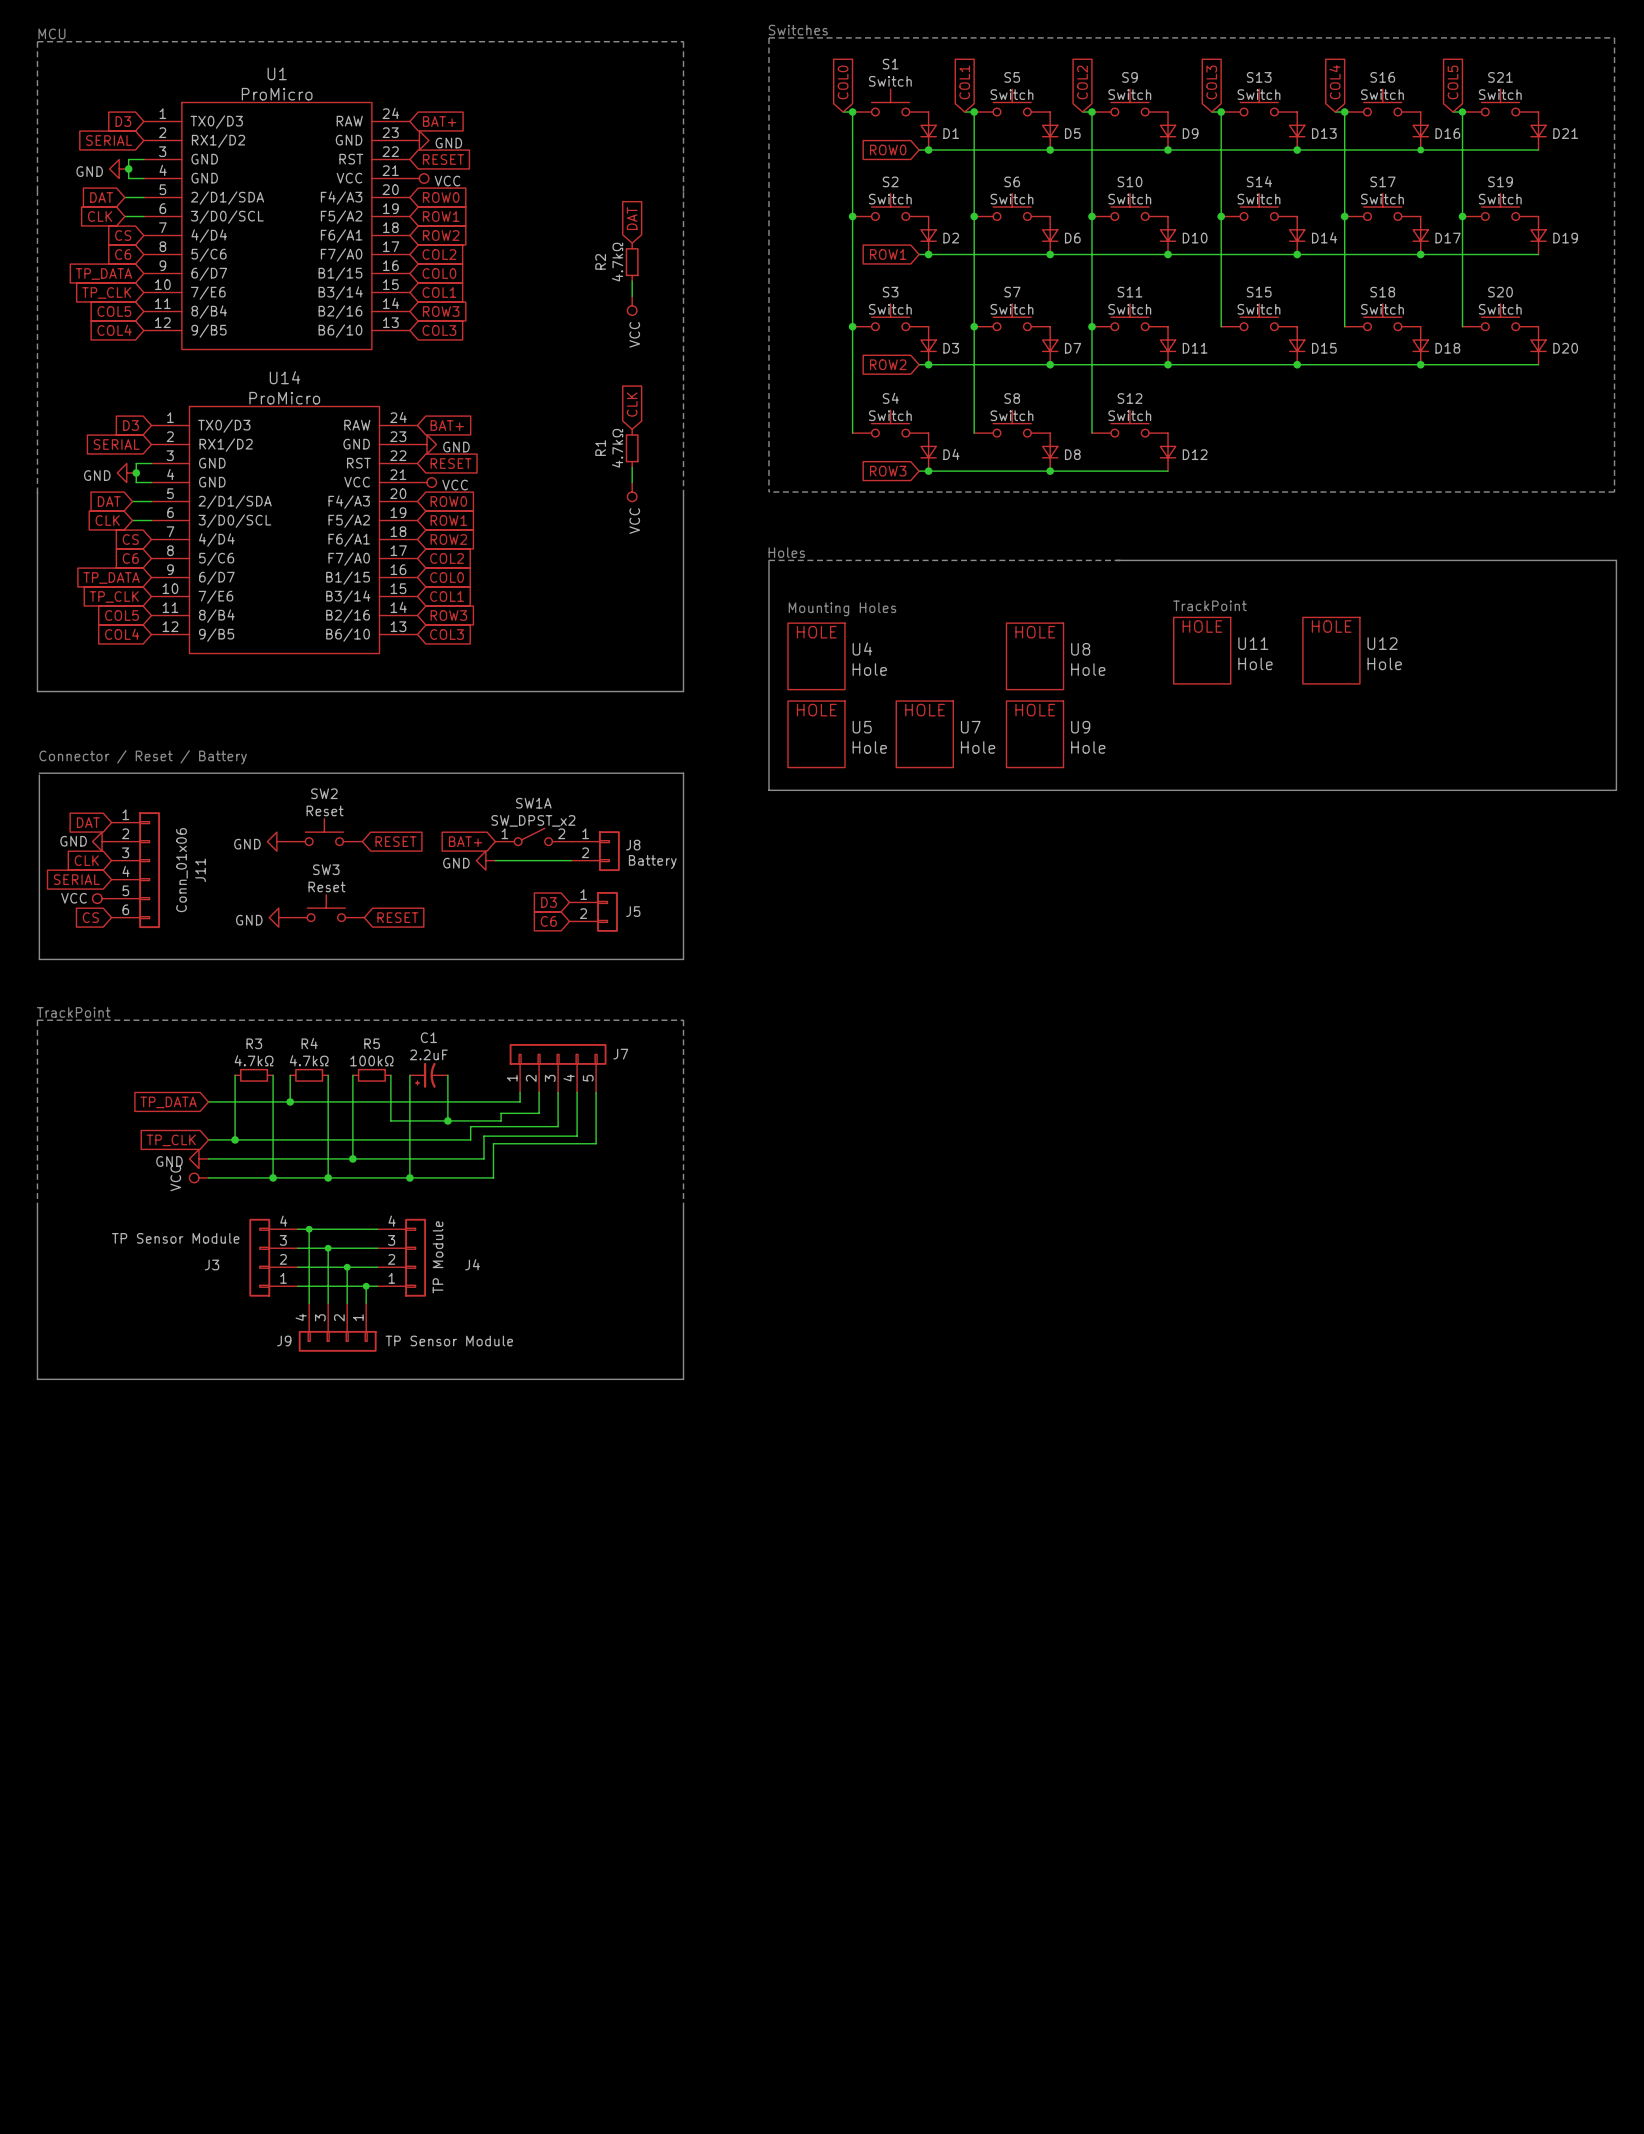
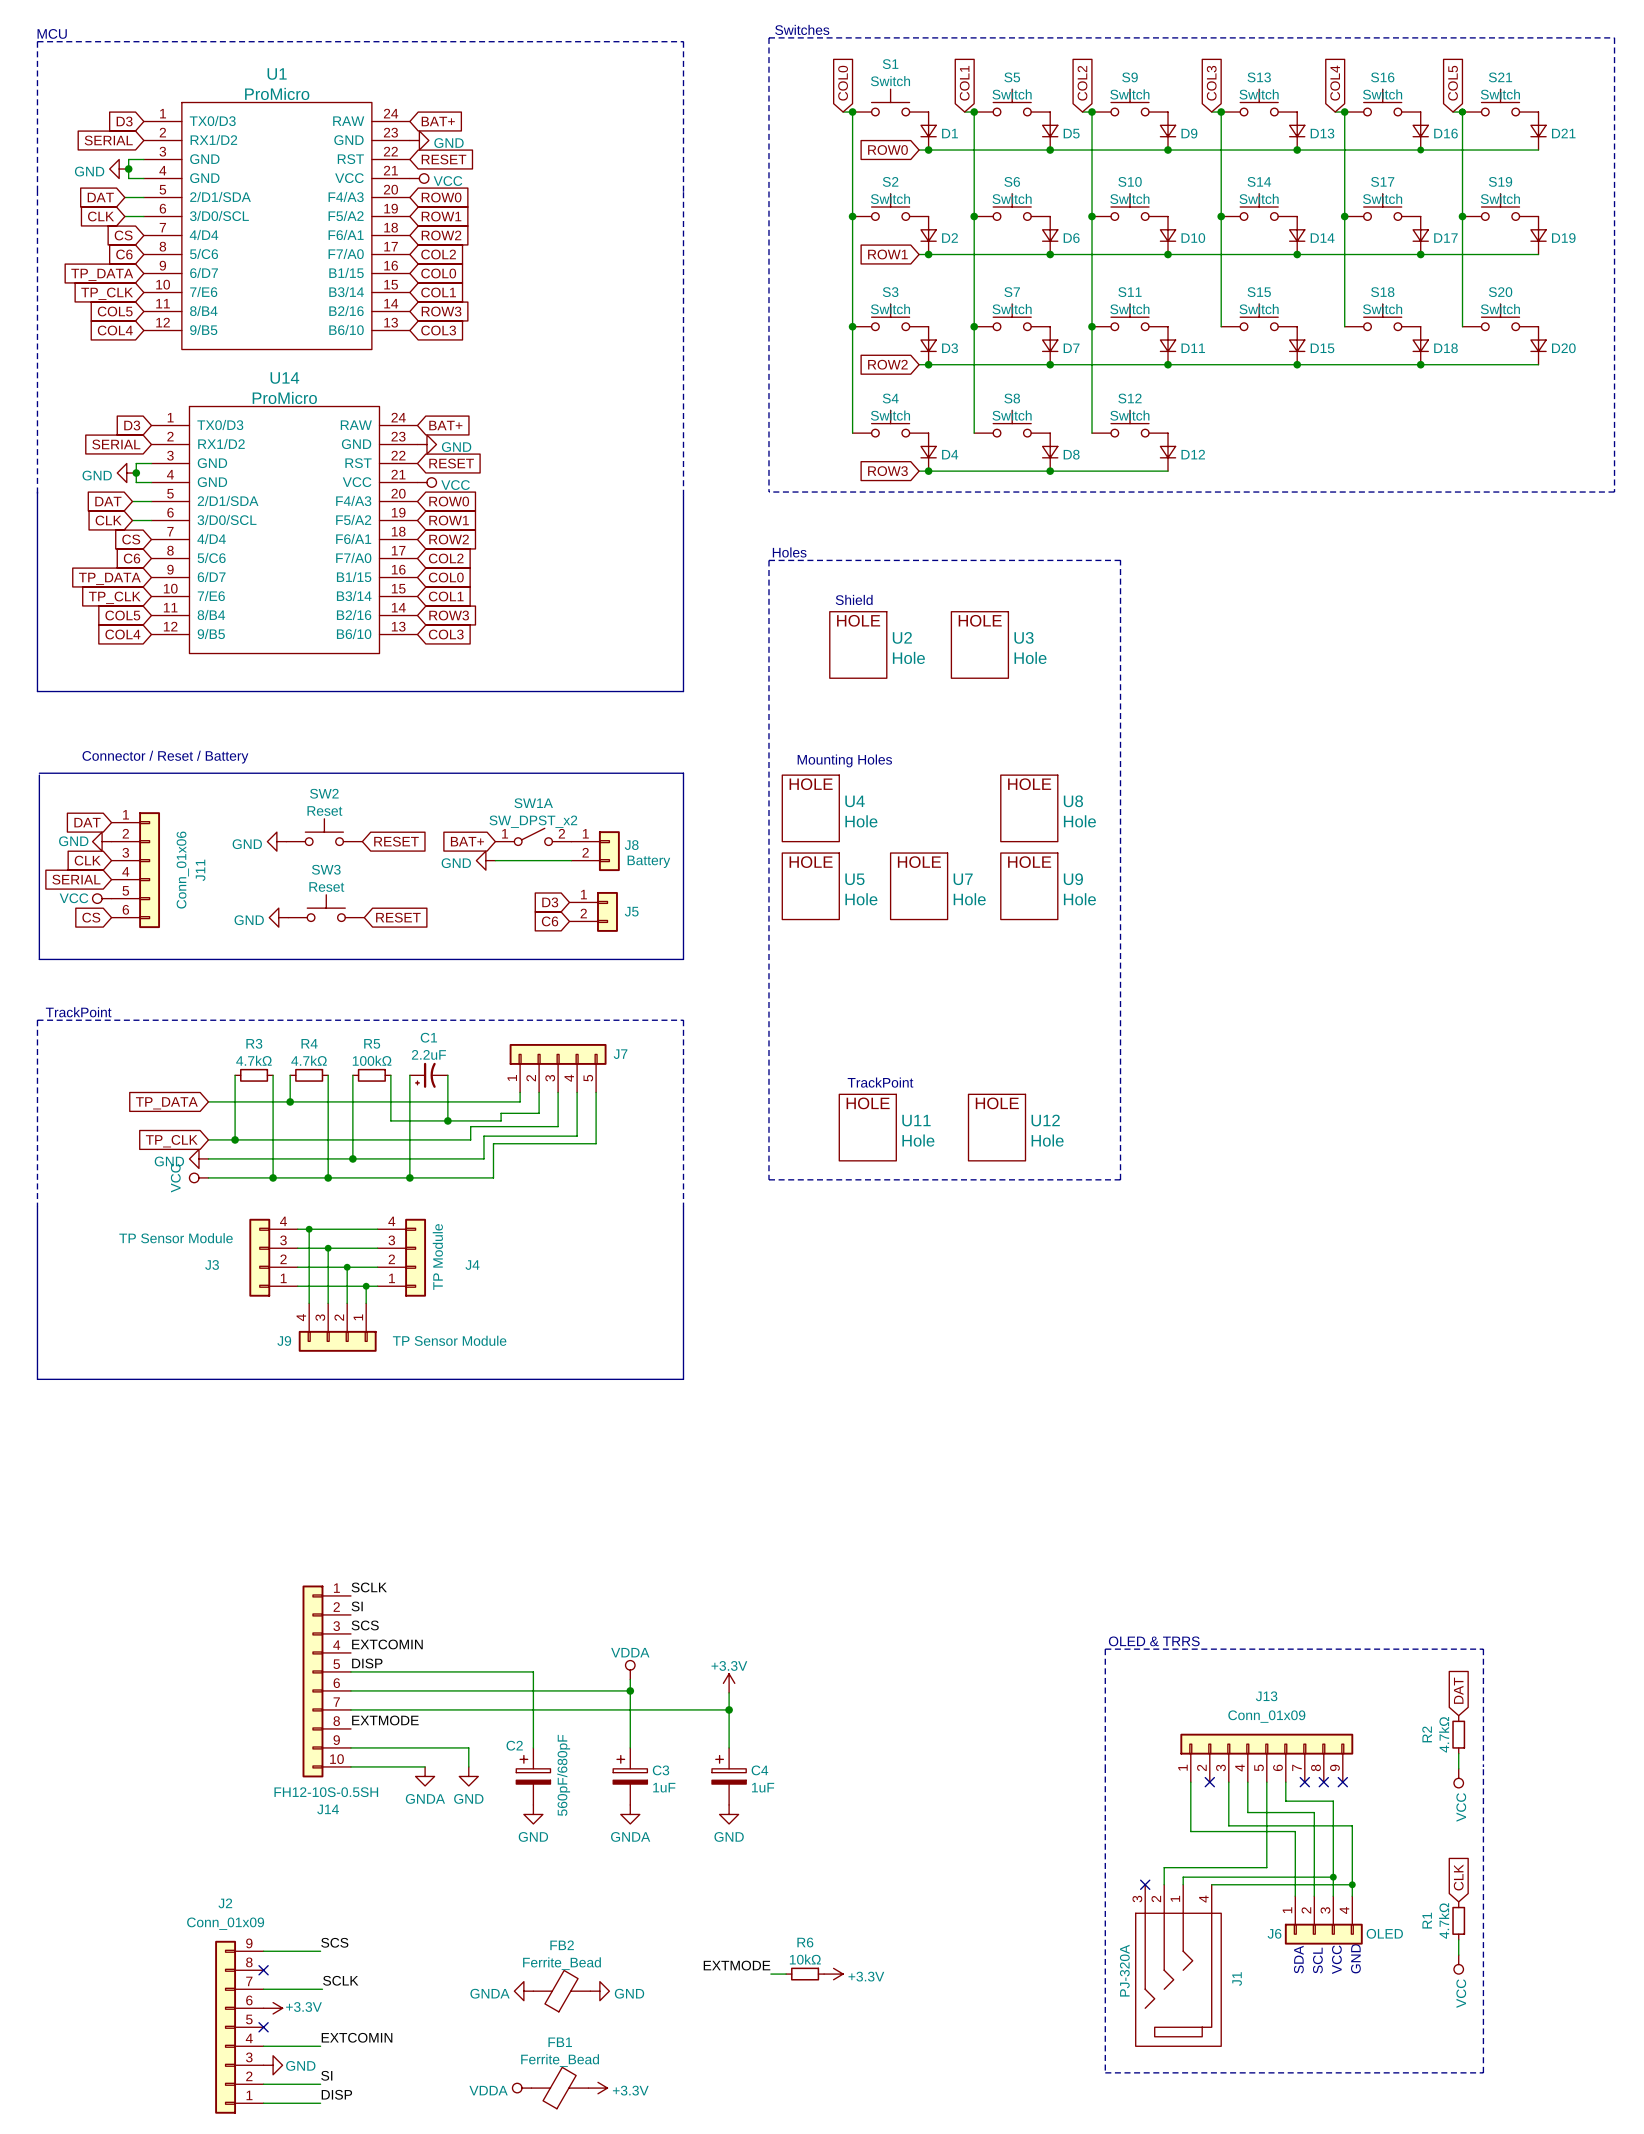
global label: DAT (632, 218) -> none
R2 position: (632, 262) -> (1458, 1734)
wire: (632, 281) (632, 296) -> none
power symbol: VCC (632, 305) -> none
global label: CLK (632, 404) -> none
R1 position: (632, 448) -> (1458, 1920)
wire: (632, 467) (632, 482) -> none
power symbol: VCC (632, 492) -> none
line: (768, 560) (768, 790) (1616, 790) (1616, 560) (1116, 560) -> (768, 560) (768, 1179) (1120, 1179) (1120, 560)
text: none -> Shield (854, 599)
text: TrackPoint (1209, 605) -> none
text position: Mounting Holes (842, 609) -> Mounting Holes (844, 760)
U2: none -> Hole (858, 644)
U3: none -> Hole (979, 644)
U11 position: (1202, 650) -> (867, 1127)
U12 position: (1331, 650) -> (997, 1127)
U4 position: (816, 656) -> (810, 808)
U8 position: (1035, 656) -> (1029, 808)
U5 position: (816, 734) -> (810, 886)
U7 position: (924, 734) -> (919, 886)
U9 position: (1035, 734) -> (1029, 886)
text: none -> TrackPoint (880, 1082)
label: none -> SCLK (369, 1587)
label: none -> SI (357, 1606)
label: none -> SCS (365, 1625)
text: none -> OLED & TRRS (1154, 1641)
label: none -> EXTCOMIN (387, 1644)
line: none -> (1105, 1649) (1105, 2072) (1483, 2072) (1483, 1649) (1105, 1649)
label: none -> DISP (367, 1663)
power symbol: none -> VDDA (630, 1670)
wire: none -> (350, 1671) (533, 1671) (533, 1747)
wire: none -> (630, 1679) (630, 1747)
J14: none -> FH12-10S-0.5SH (326, 1681)
power symbol: none -> +3.3V (729, 1683)
wire: none -> (350, 1690) (630, 1690)
junction: none -> (630, 1690)
global label: none -> DAT (1458, 1690)
wire: none -> (729, 1692) (729, 1747)
wire: none -> (350, 1709) (729, 1709)
junction: none -> (729, 1709)
label: none -> EXTMODE (385, 1720)
wire: none -> (350, 1747) (468, 1747) (468, 1766)
wire: none -> (1458, 1753) (1458, 1768)
J13: none -> Conn_01x09 (1266, 1757)
wire: none -> (350, 1766) (425, 1766)
power symbol: none -> GNDA (425, 1776)
power symbol: none -> GND (468, 1776)
C2: none -> 560pF/680pF (533, 1776)
C3: none -> 1uF (630, 1776)
C4: none -> 1uF (729, 1776)
power symbol: none -> VCC (1458, 1778)
wire: none -> (1190, 1782) (1190, 1831) (1295, 1831) (1295, 1896)
no-connect mark: none -> (1209, 1782)
wire: none -> (1228, 1782) (1228, 1825) (1352, 1825) (1352, 1896)
wire: none -> (1247, 1782) (1247, 1812) (1314, 1812) (1314, 1896)
wire: none -> (1266, 1782) (1266, 1867) (1164, 1867) (1164, 1884)
wire: none -> (1285, 1782) (1285, 1801) (1333, 1801) (1333, 1896)
no-connect mark: none -> (1304, 1782)
no-connect mark: none -> (1323, 1782)
no-connect mark: none -> (1342, 1782)
power symbol: none -> GND (533, 1814)
power symbol: none -> GNDA (630, 1814)
power symbol: none -> GND (729, 1814)
wire: none -> (1333, 1877) (1183, 1877) (1183, 1884)
junction: none -> (1333, 1877)
global label: none -> CLK (1458, 1877)
no-connect mark: none -> (1145, 1884)
wire: none -> (1211, 1884) (1352, 1884)
junction: none -> (1352, 1884)
J6: none -> OLED (1323, 1920)
wire: none -> (1458, 1939) (1458, 1955)
label: none -> SCS (334, 1942)
wire: none -> (263, 1951) (320, 1951)
text: none -> GND (1355, 1958)
text: none -> SDA (1298, 1959)
text: none -> SCL (1317, 1960)
text: none -> VCC (1336, 1959)
power symbol: none -> VCC (1458, 1964)
label: none -> EXTMODE (737, 1965)
J1: none -> PJ-320A (1178, 1965)
no-connect mark: none -> (263, 1970)
wire: none -> (770, 1974) (786, 1974)
R6: none -> 10kΩ (805, 1974)
power symbol: none -> +3.3V (833, 1974)
label: none -> SCLK (340, 1980)
wire: none -> (263, 1989) (322, 1989)
power symbol: none -> GNDA (523, 1991)
FB2: none -> Ferrite_Bead (561, 1991)
power symbol: none -> GND (599, 1991)
power symbol: none -> +3.3V (273, 2008)
J2: none -> Conn_01x09 (239, 2027)
no-connect mark: none -> (263, 2027)
label: none -> EXTCOMIN (357, 2037)
wire: none -> (263, 2046) (320, 2046)
power symbol: none -> GND (273, 2065)
label: none -> SI (326, 2075)
wire: none -> (263, 2084) (320, 2084)
power symbol: none -> VDDA (521, 2088)
FB1: none -> Ferrite_Bead (559, 2088)
power symbol: none -> +3.3V (597, 2088)
label: none -> DISP (336, 2094)
wire: none -> (263, 2103) (320, 2103)

